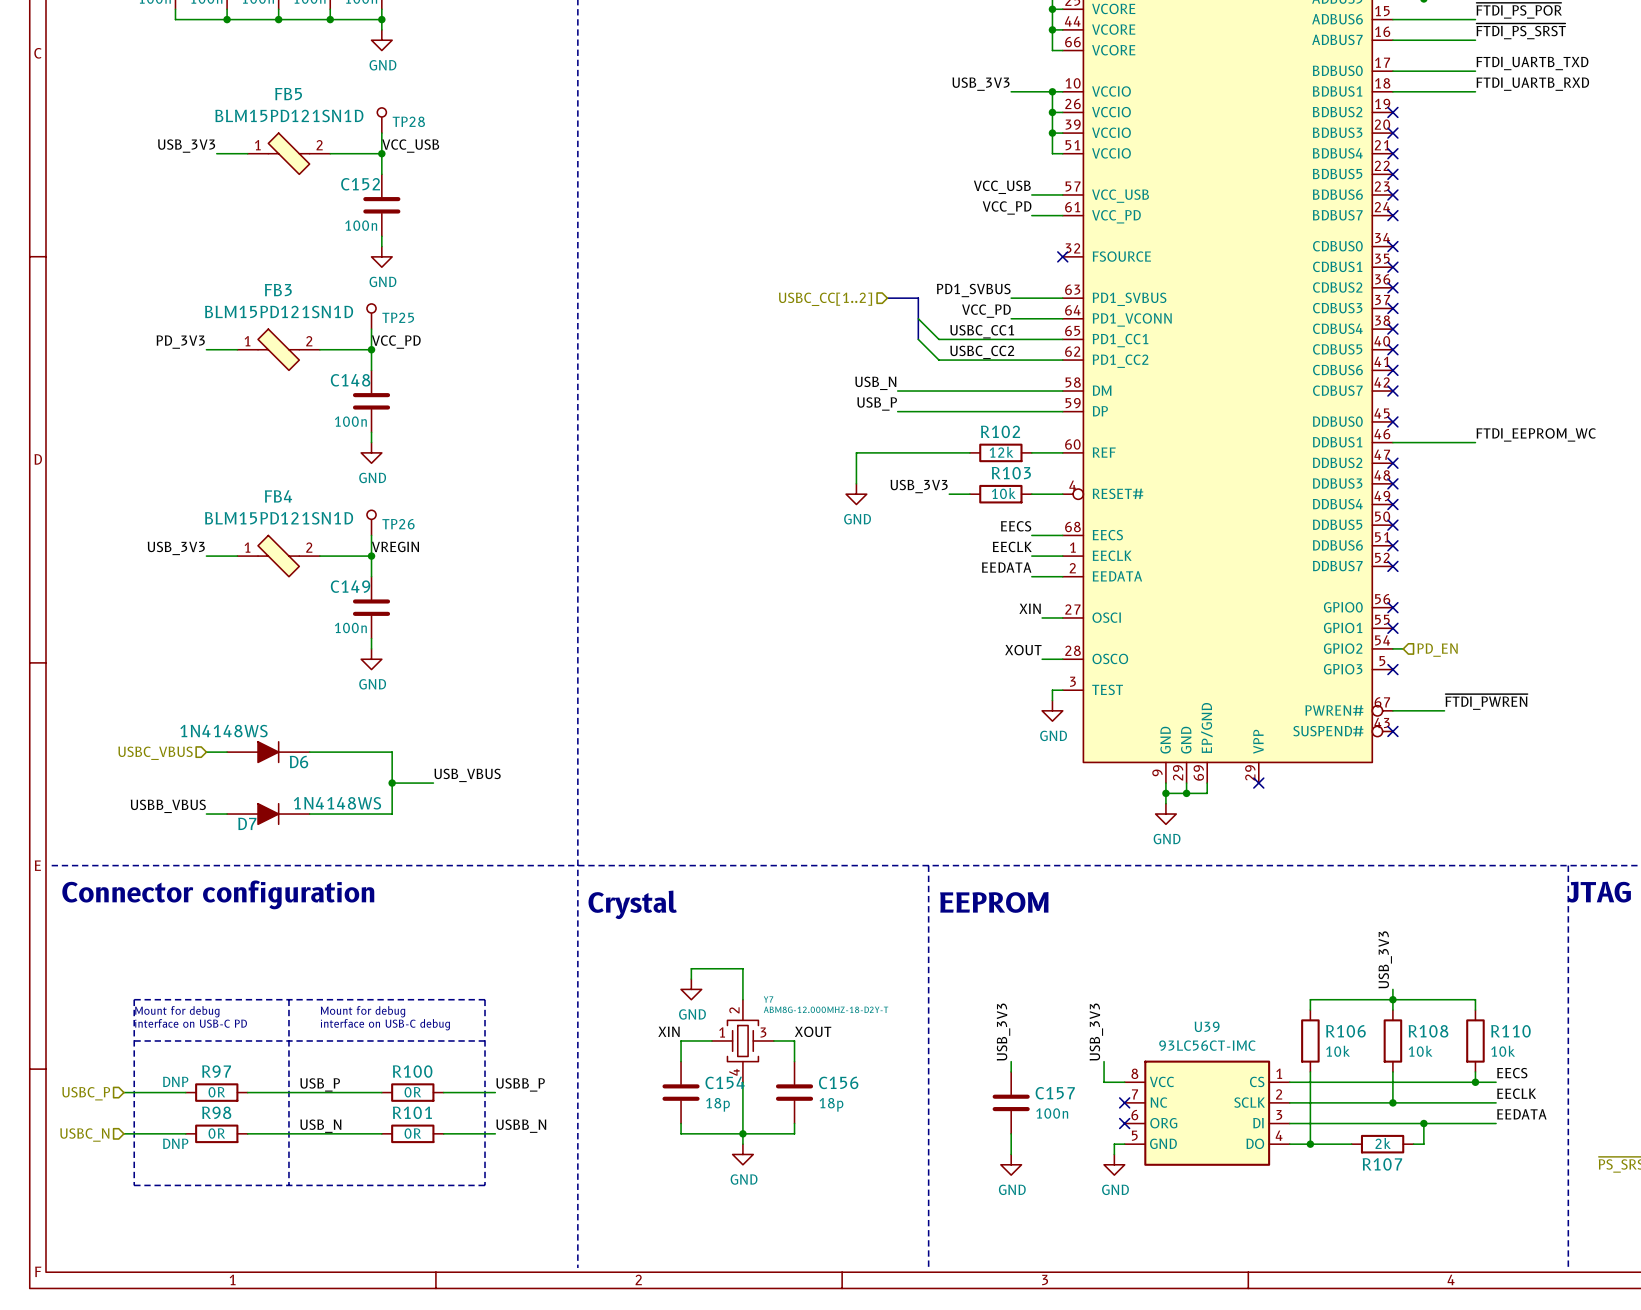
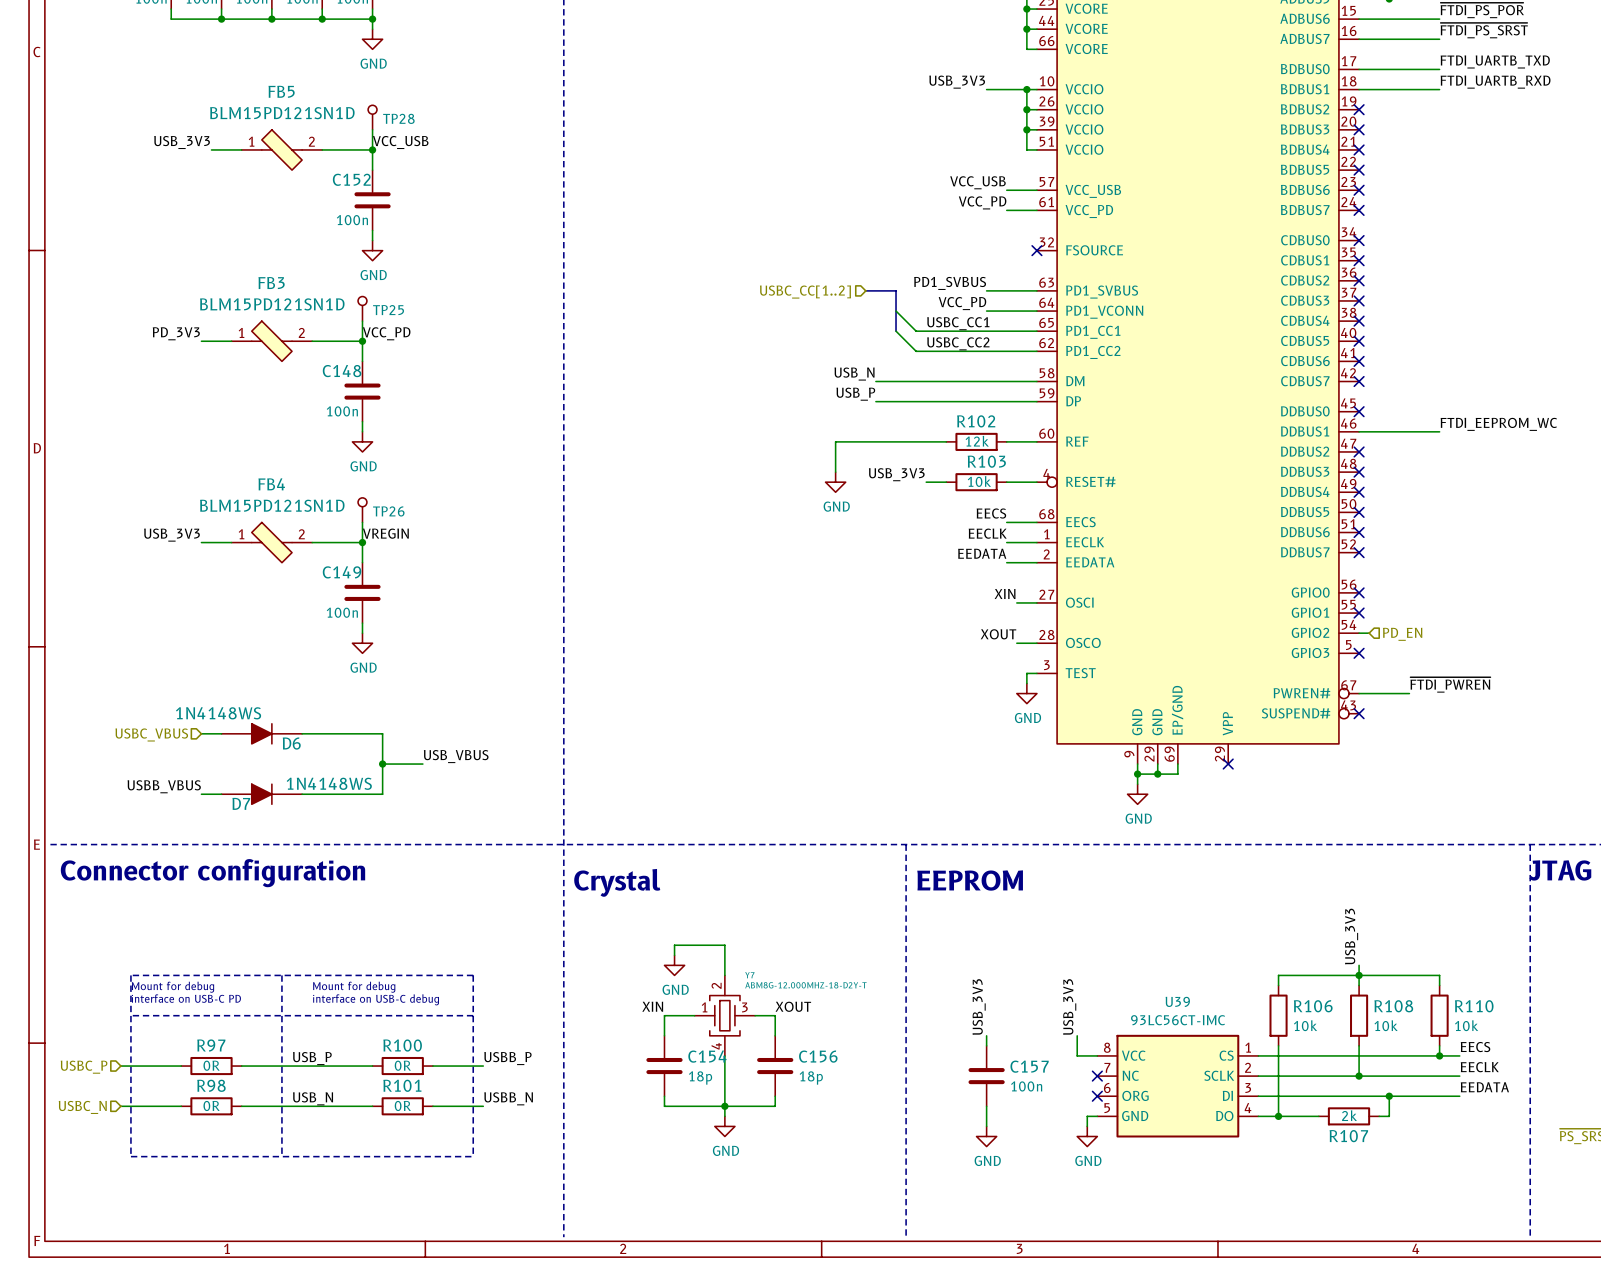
R97 text: DNP (175, 1081) -> none
R98 text: DNP (175, 1143) -> none

